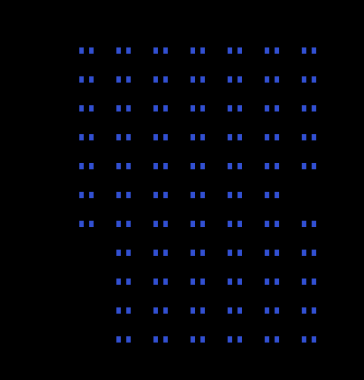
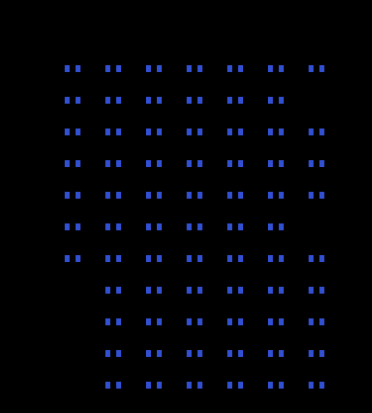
part: (308, 79) -> none

